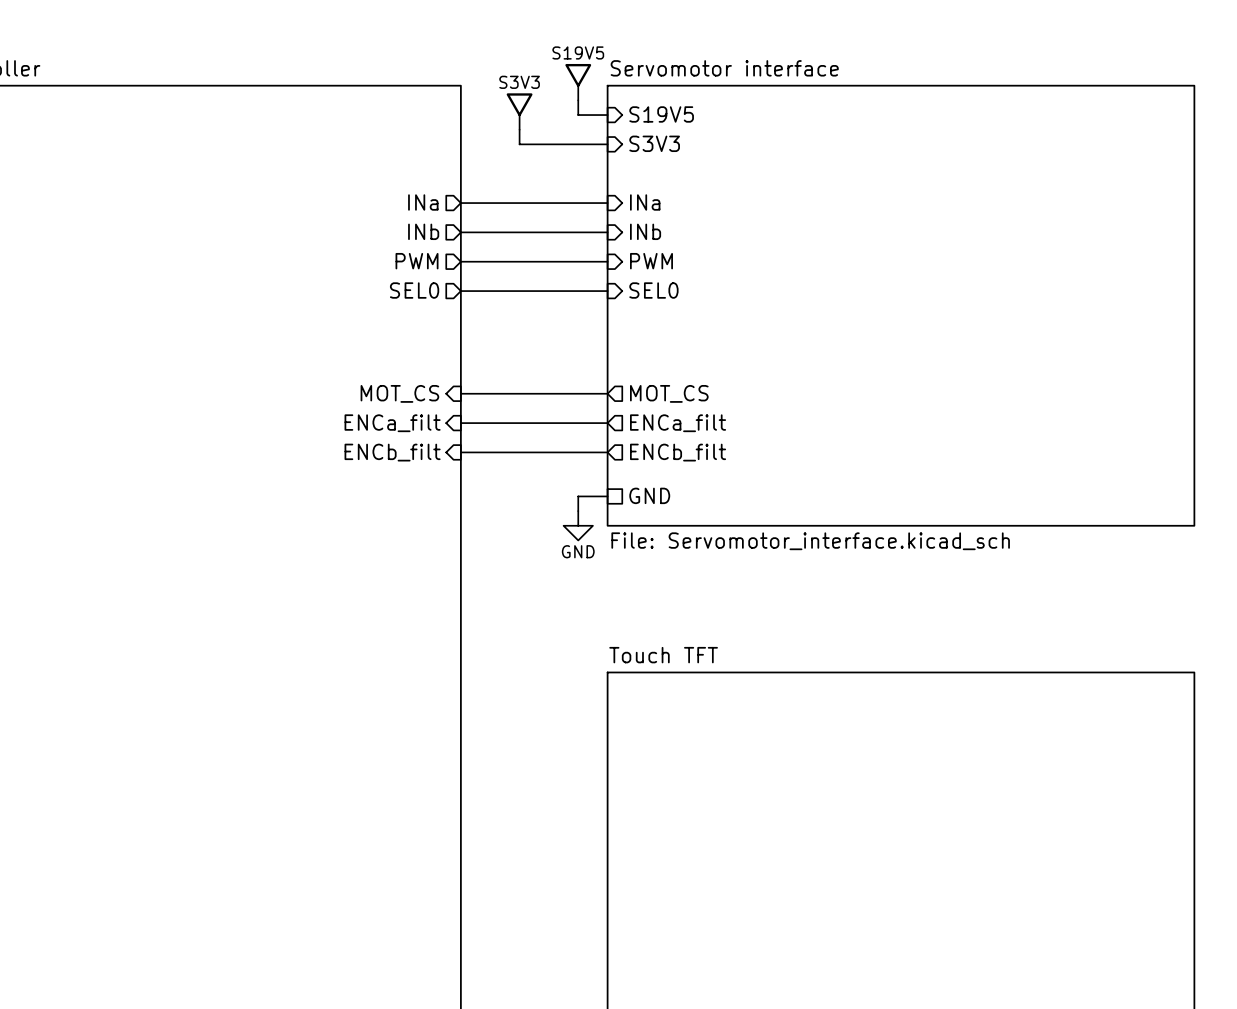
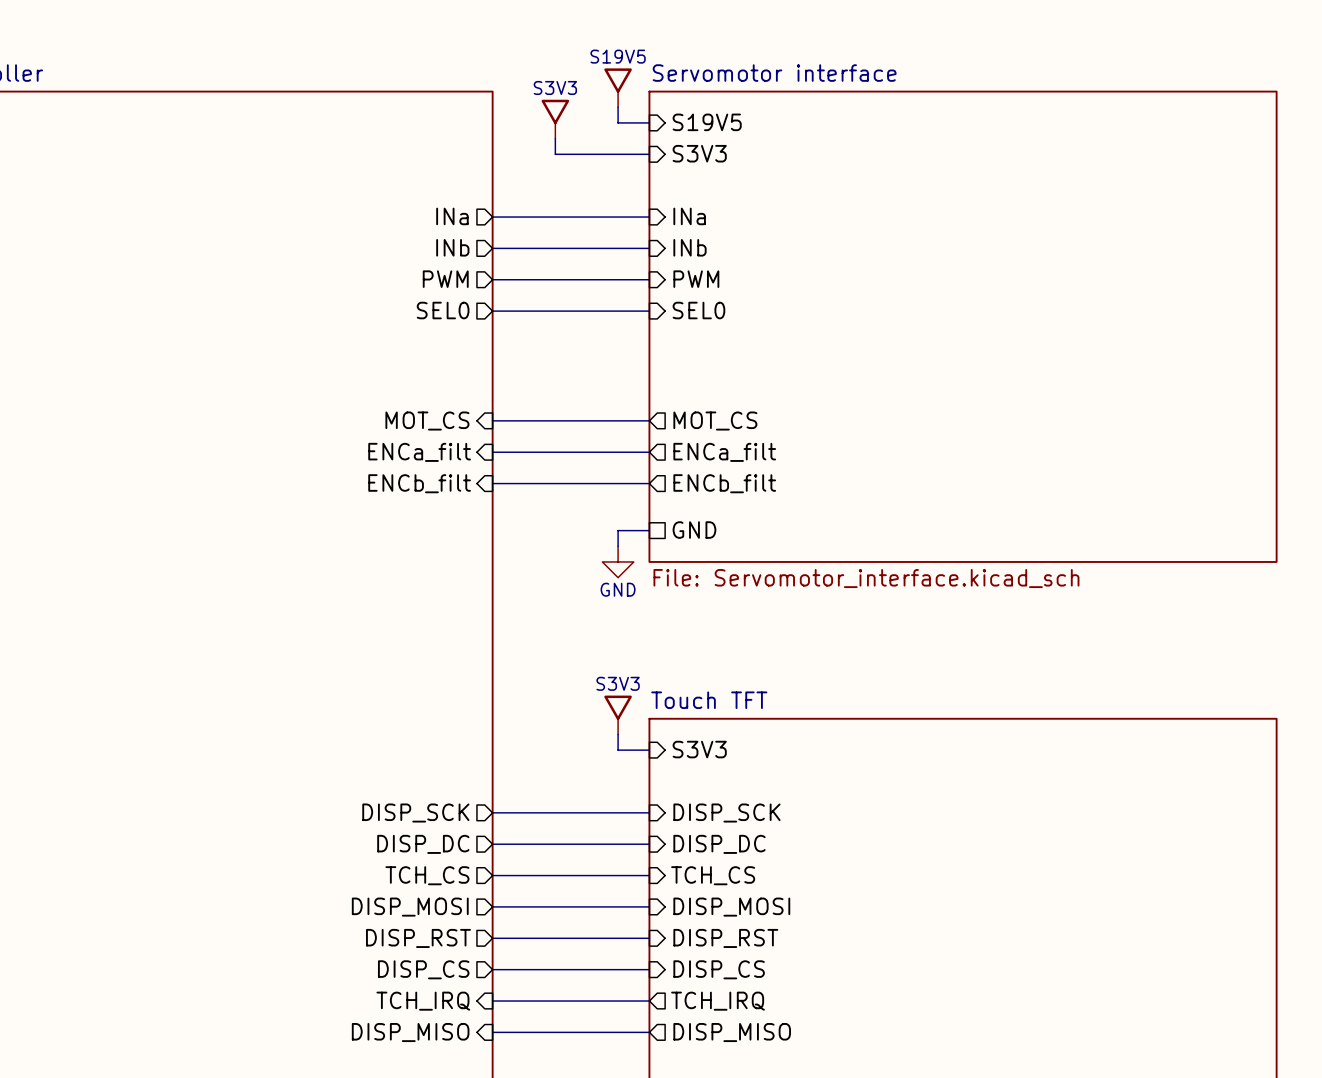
power symbol: none -> S3V3 (618, 715)
wire: none -> (618, 734) (618, 750) (649, 750)
sheet pin: none -> S3V3 (699, 749)
sheet pin: none -> DISP_SCK (415, 813)
wire: none -> (492, 812) (649, 812)
sheet pin: none -> DISP_SCK (726, 813)
sheet pin: none -> DISP_DC (423, 844)
wire: none -> (492, 844) (649, 844)
sheet pin: none -> DISP_DC (719, 844)
sheet pin: none -> TCH_CS (427, 875)
wire: none -> (492, 875) (649, 875)
sheet pin: none -> TCH_CS (713, 875)
sheet pin: none -> DISP_MOSI (410, 907)
wire: none -> (492, 906) (649, 906)
sheet pin: none -> DISP_MOSI (731, 907)
wire: none -> (492, 938) (649, 938)
sheet pin: none -> DISP_RST (418, 938)
sheet pin: none -> DISP_RST (725, 938)
sheet pin: none -> DISP_CS (423, 969)
wire: none -> (492, 969) (649, 969)
sheet pin: none -> DISP_CS (719, 969)
sheet pin: none -> TCH_IRQ (423, 1001)
wire: none -> (492, 1001) (649, 1001)
sheet pin: none -> TCH_IRQ (718, 1001)
wire: none -> (492, 1032) (649, 1032)
sheet pin: none -> DISP_MISO (410, 1032)
sheet pin: none -> DISP_MISO (732, 1032)

